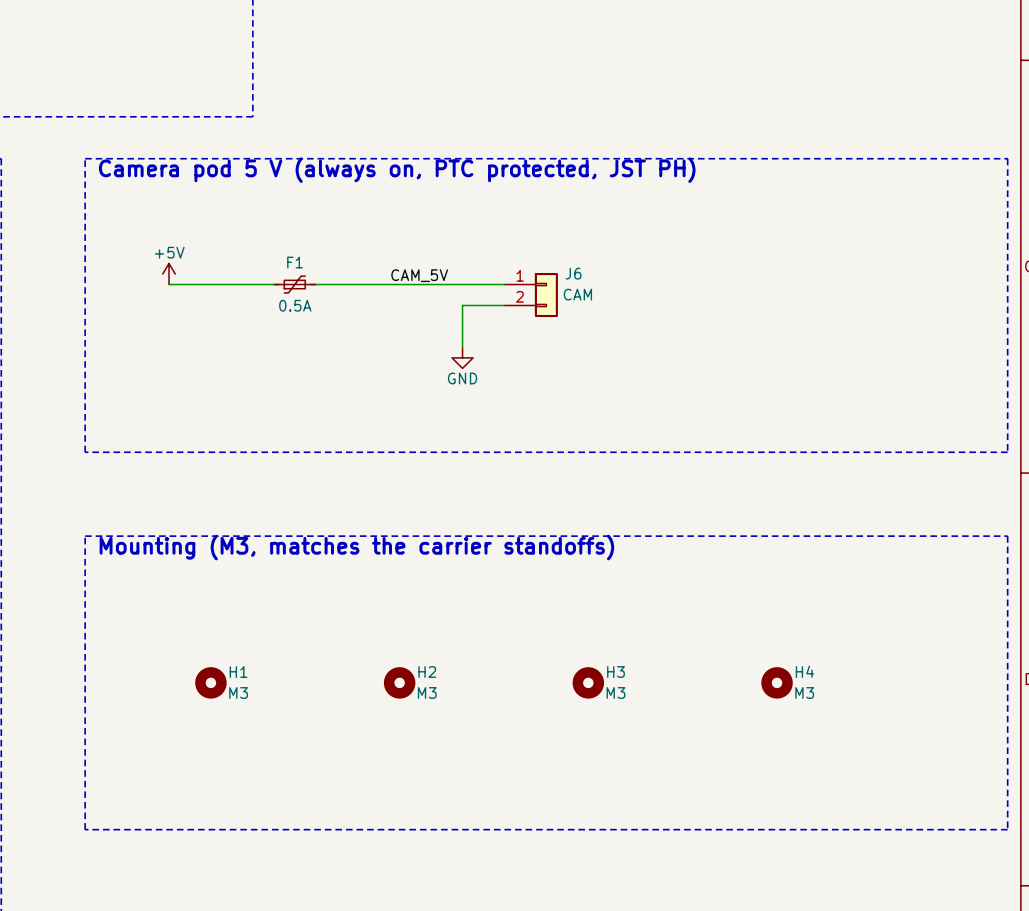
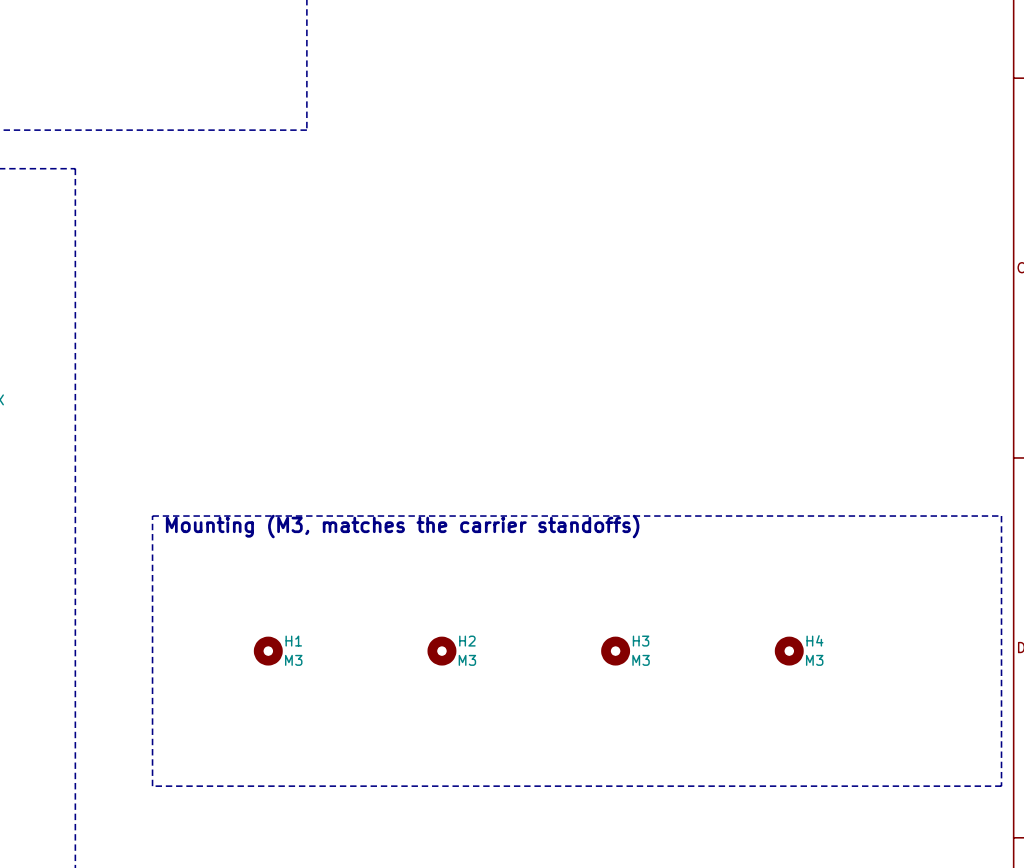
line: (85, 158) (1007, 158) (1007, 452) (85, 452) (85, 158) -> none
text: Camera pod 5 V (always on, PTC protected, JST PH) (397, 170) -> none
power symbol: +5V (169, 274) -> none
label: CAM_5V (419, 275) -> none
wire: (169, 284) (273, 284) -> none
F1: 0.5A (294, 284) -> none
wire: (315, 284) (504, 284) -> none
J6: CAM (531, 295) -> none
wire: (504, 305) (462, 305) (462, 347) -> none
power symbol: GND (462, 357) -> none

